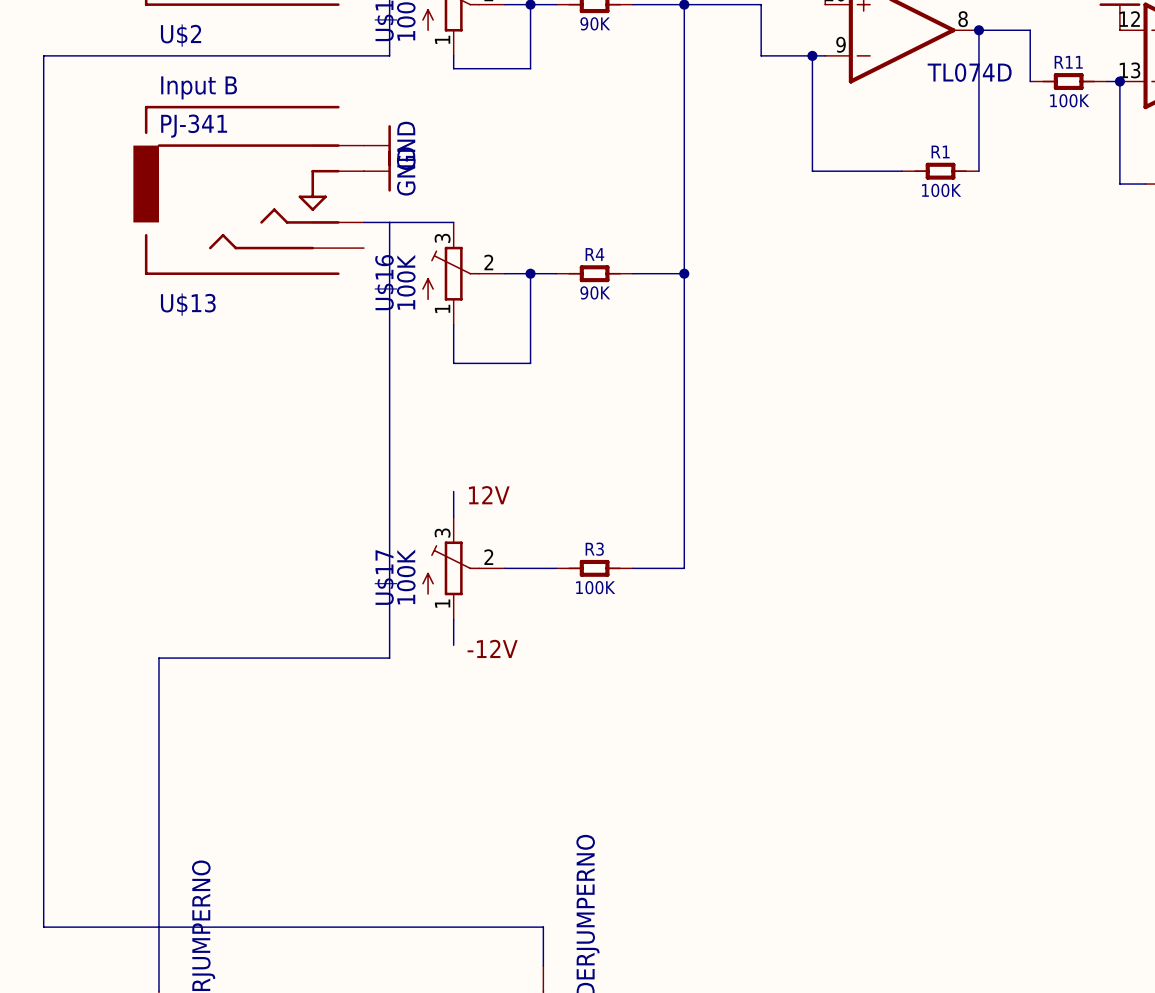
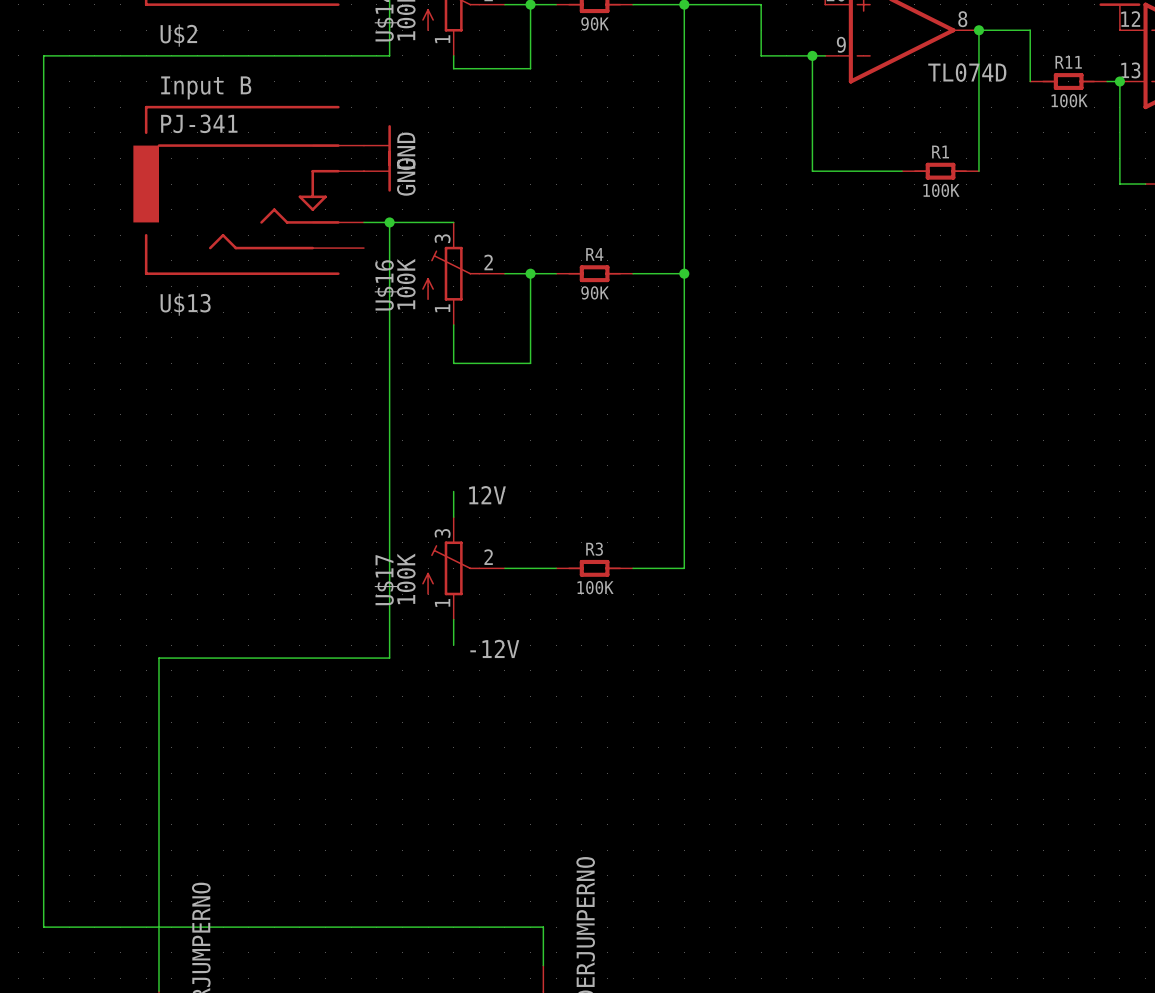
junction: none -> (389, 222)

